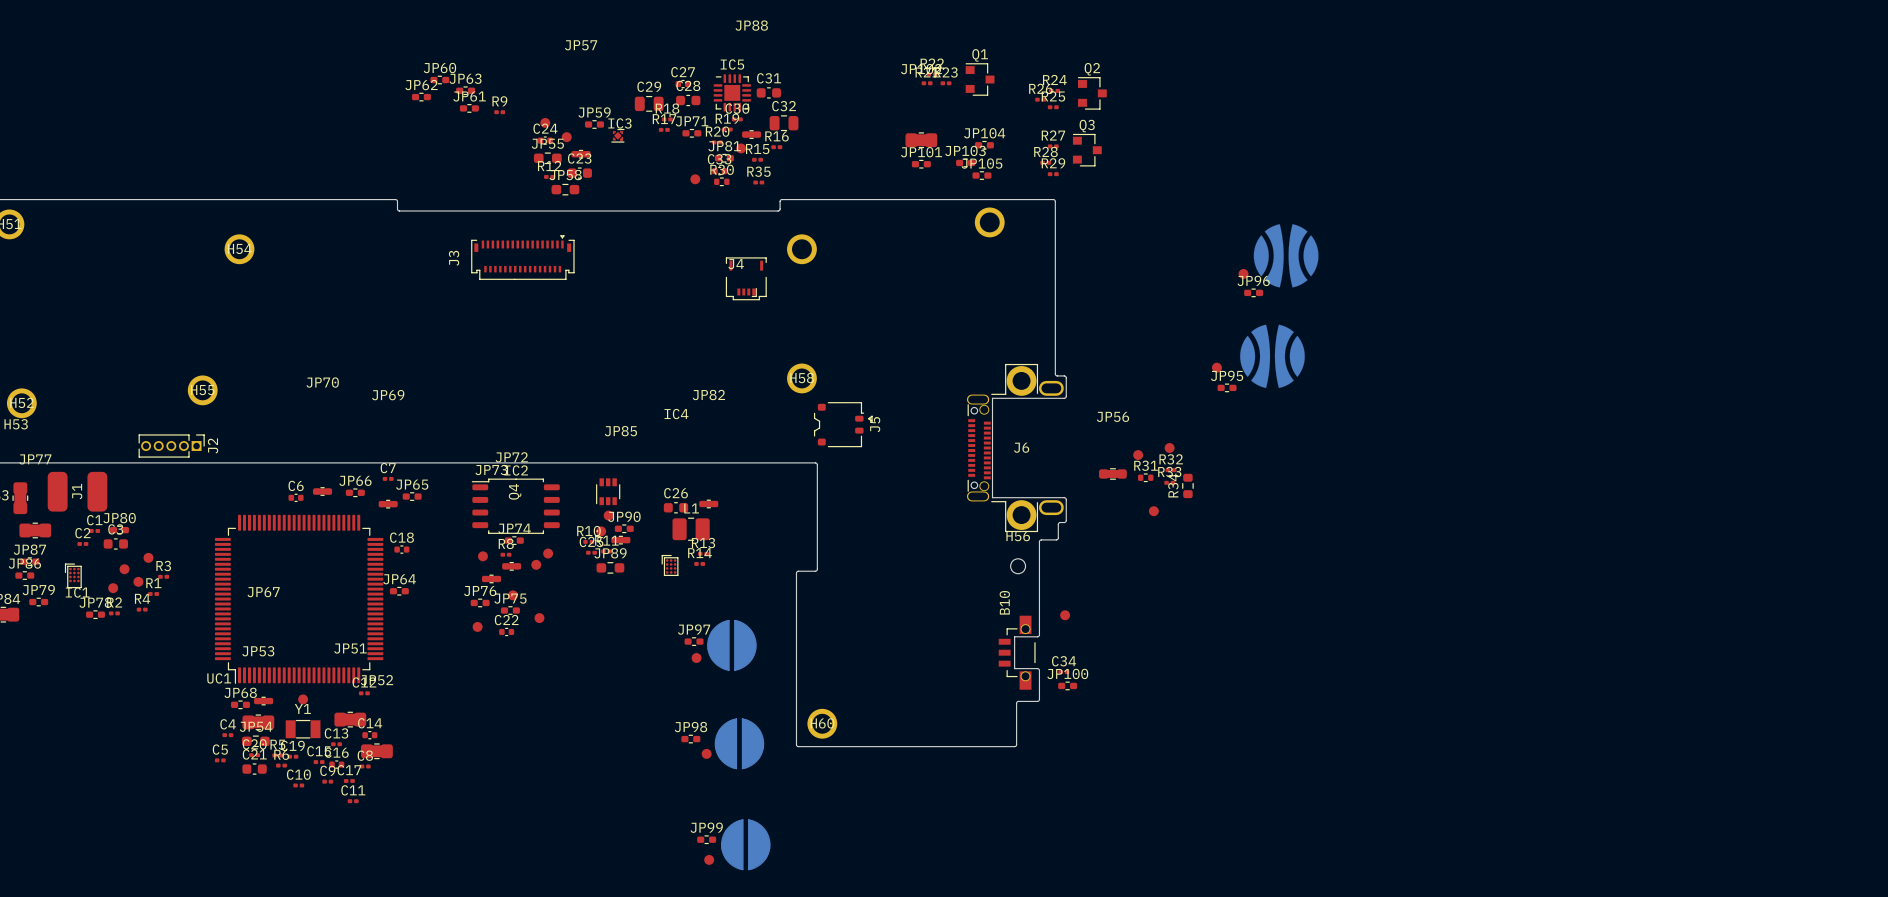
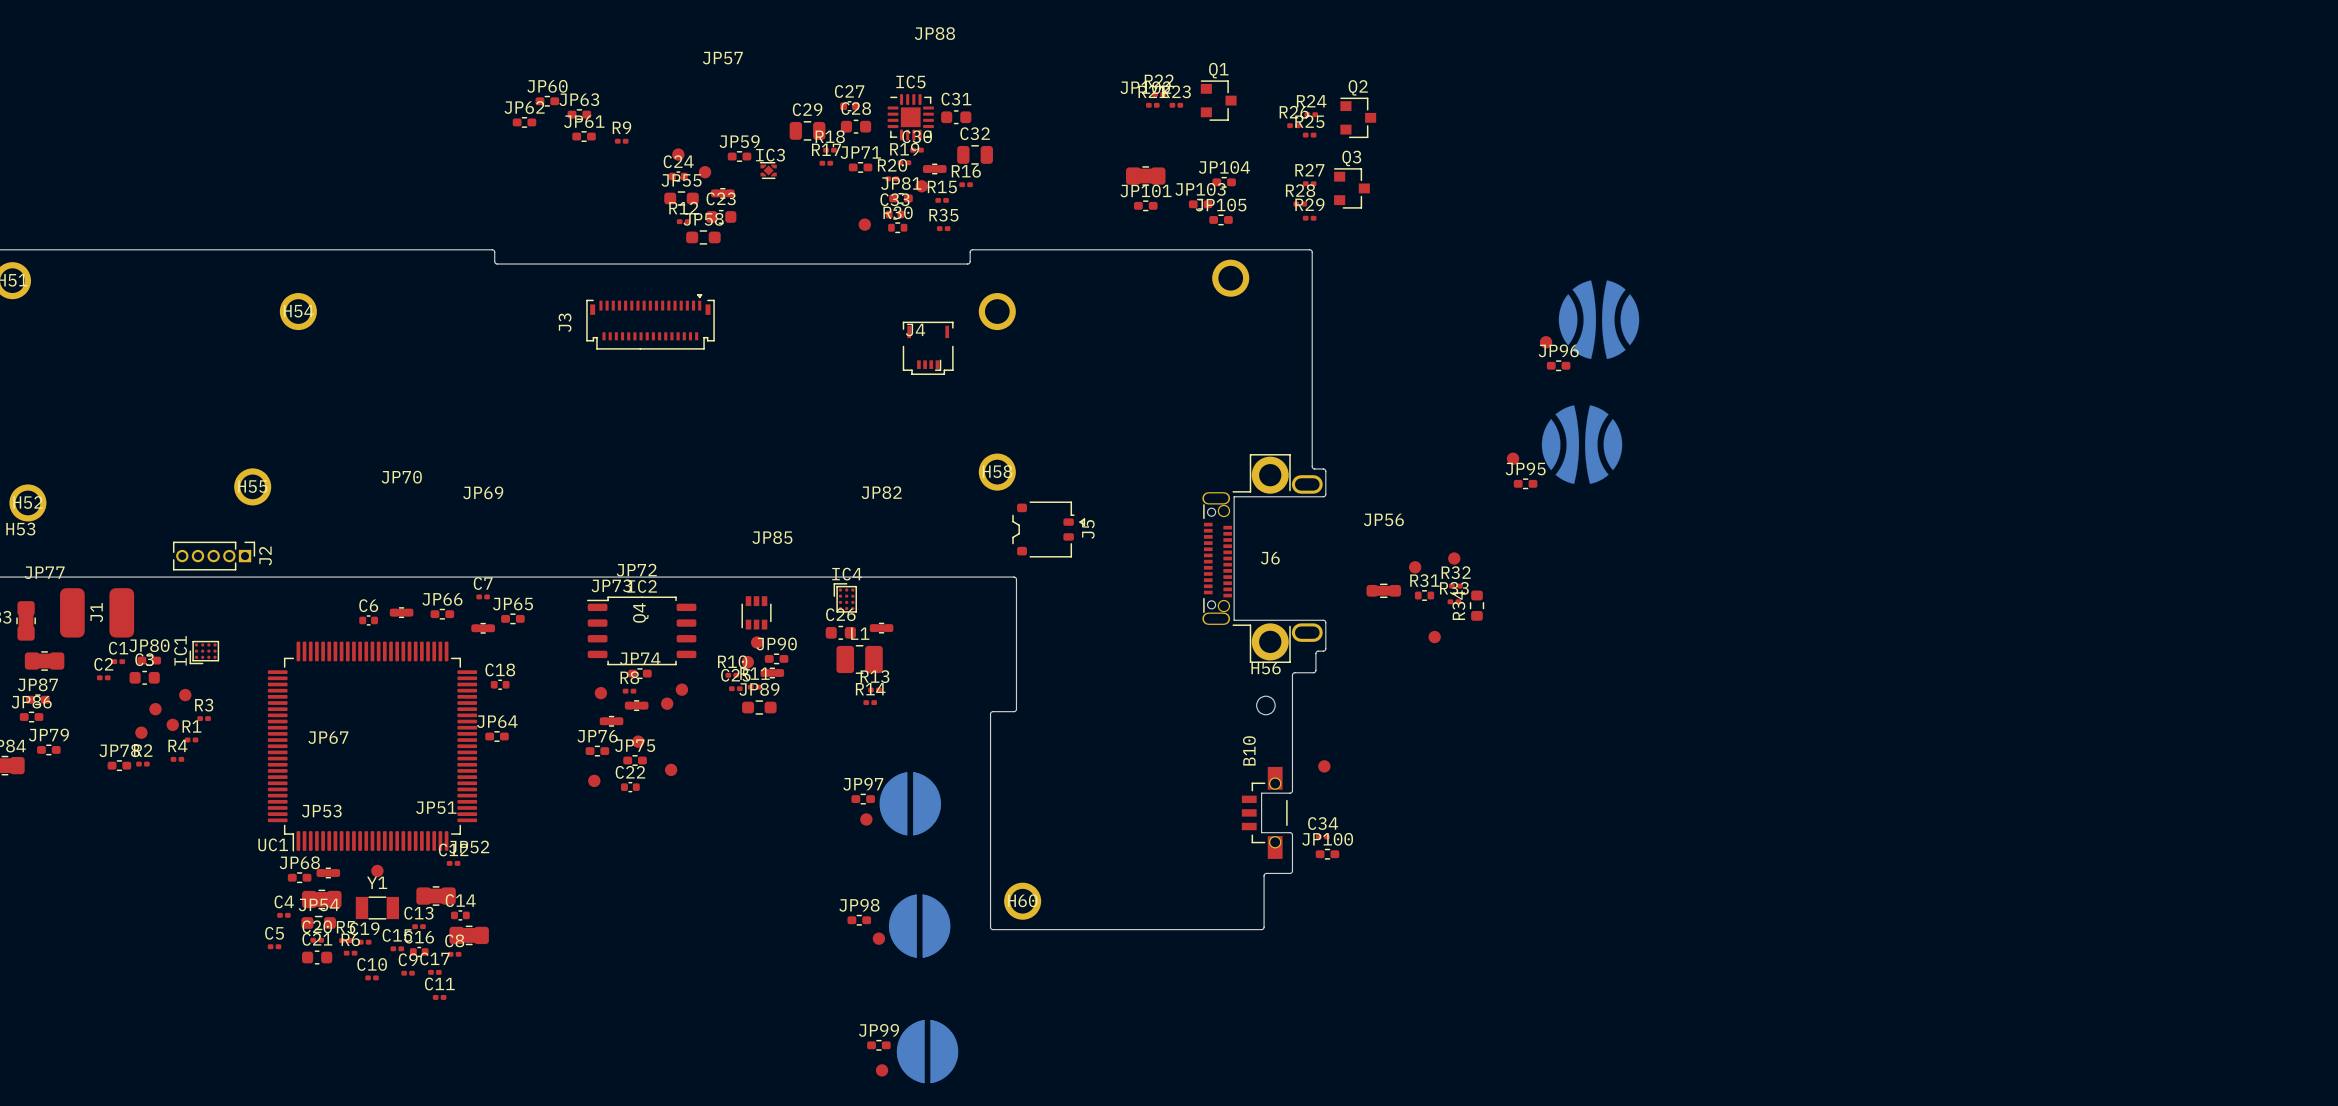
IC3 footprint: [611, 128, 625, 143] -> [759, 162, 777, 180]
IC4 name position: IC4 (676, 414) -> IC4 (847, 574)
IC4 footprint: [661, 554, 679, 576] -> [833, 583, 857, 613]
IC1 footprint: [64, 563, 82, 589] -> [189, 640, 220, 665]
IC1 name position: IC1 (77, 592) -> IC1 (180, 650)

